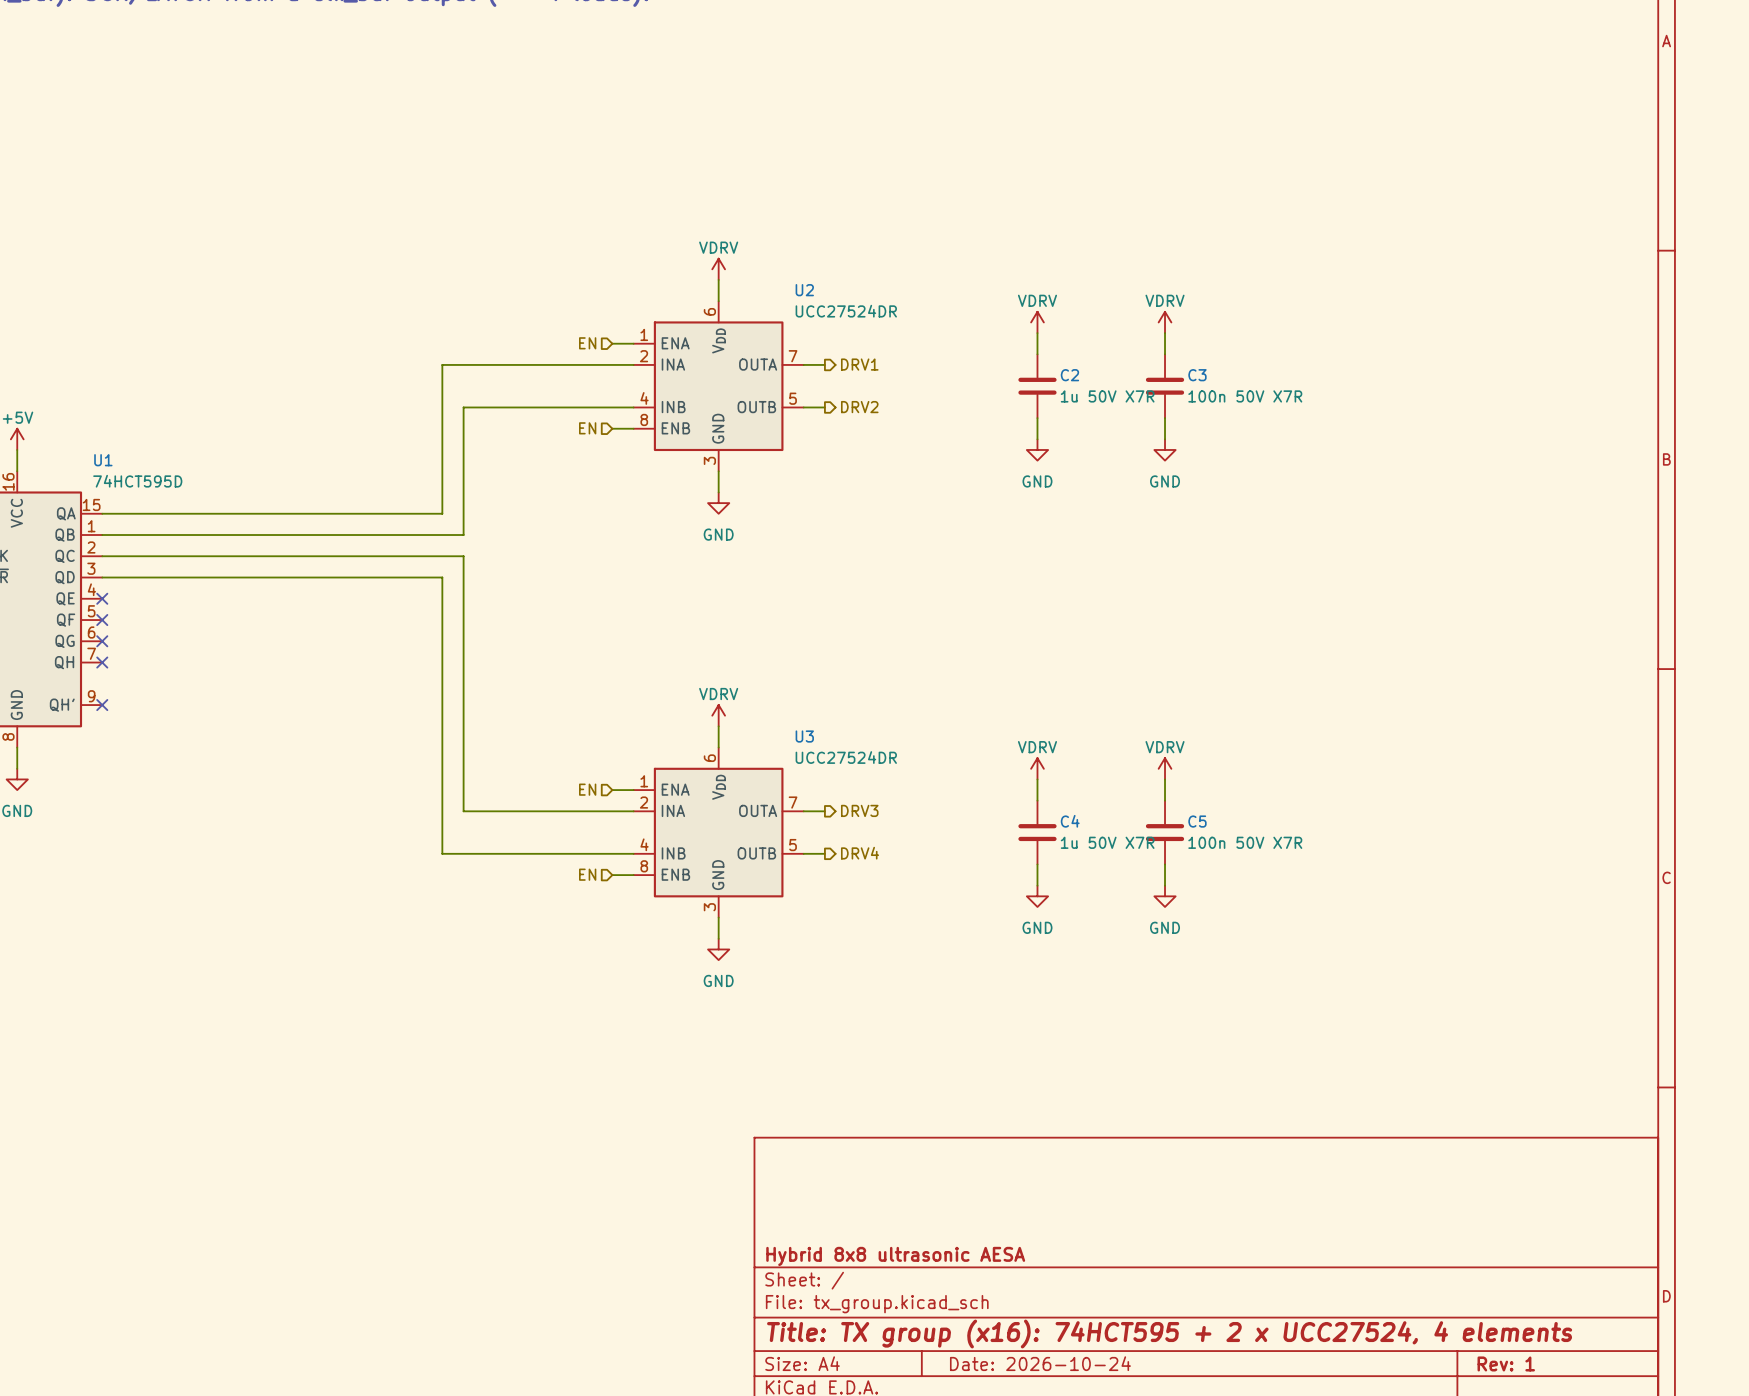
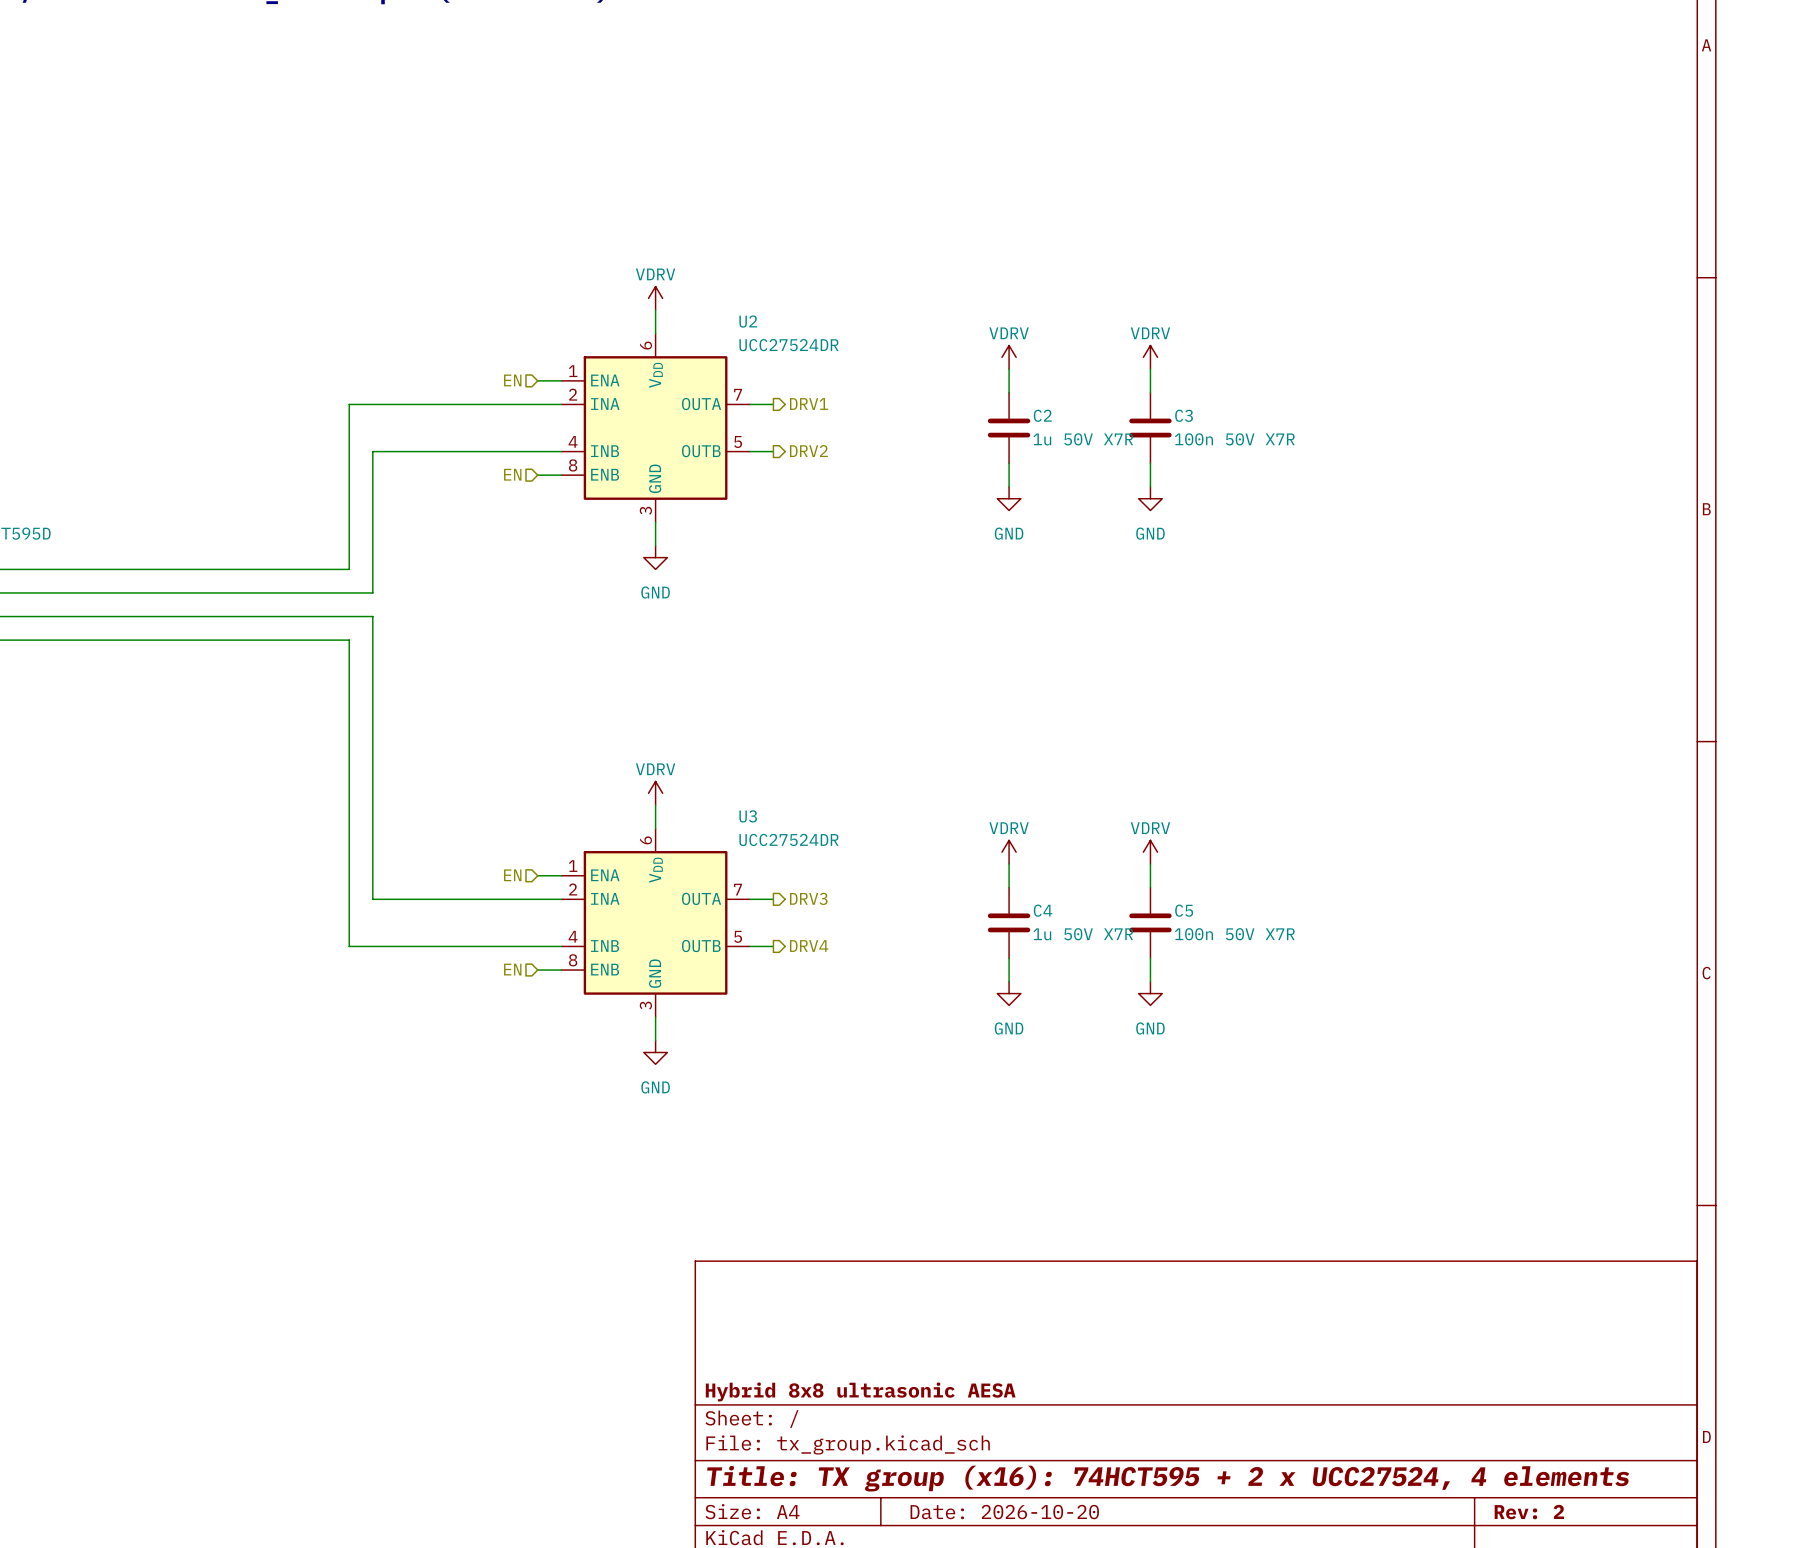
title block: Date: 2026-10-24 (1040, 1363) -> Date: 2026-10-20 (1004, 1512)
title block: Rev: 1 (1506, 1363) -> Rev: 2 (1529, 1512)

